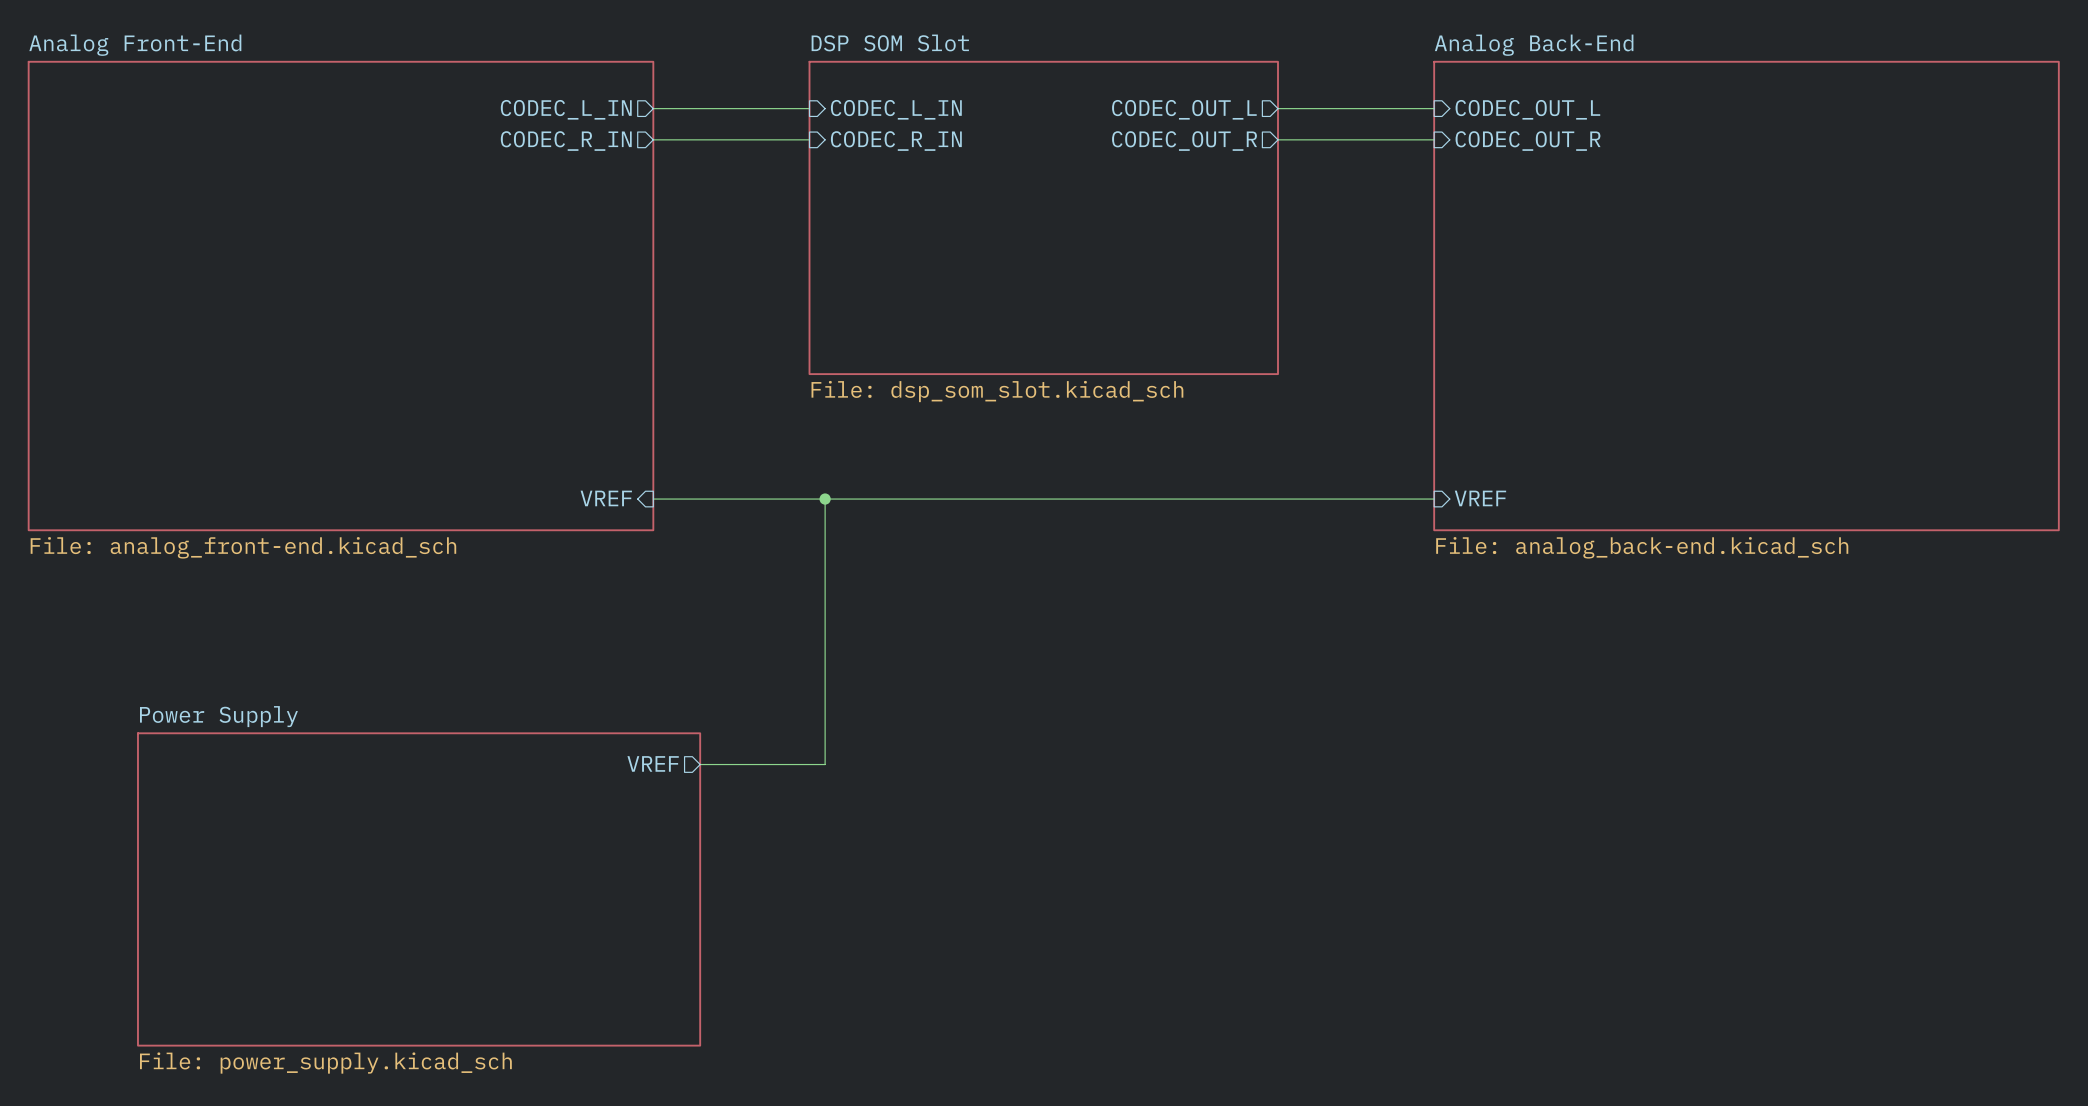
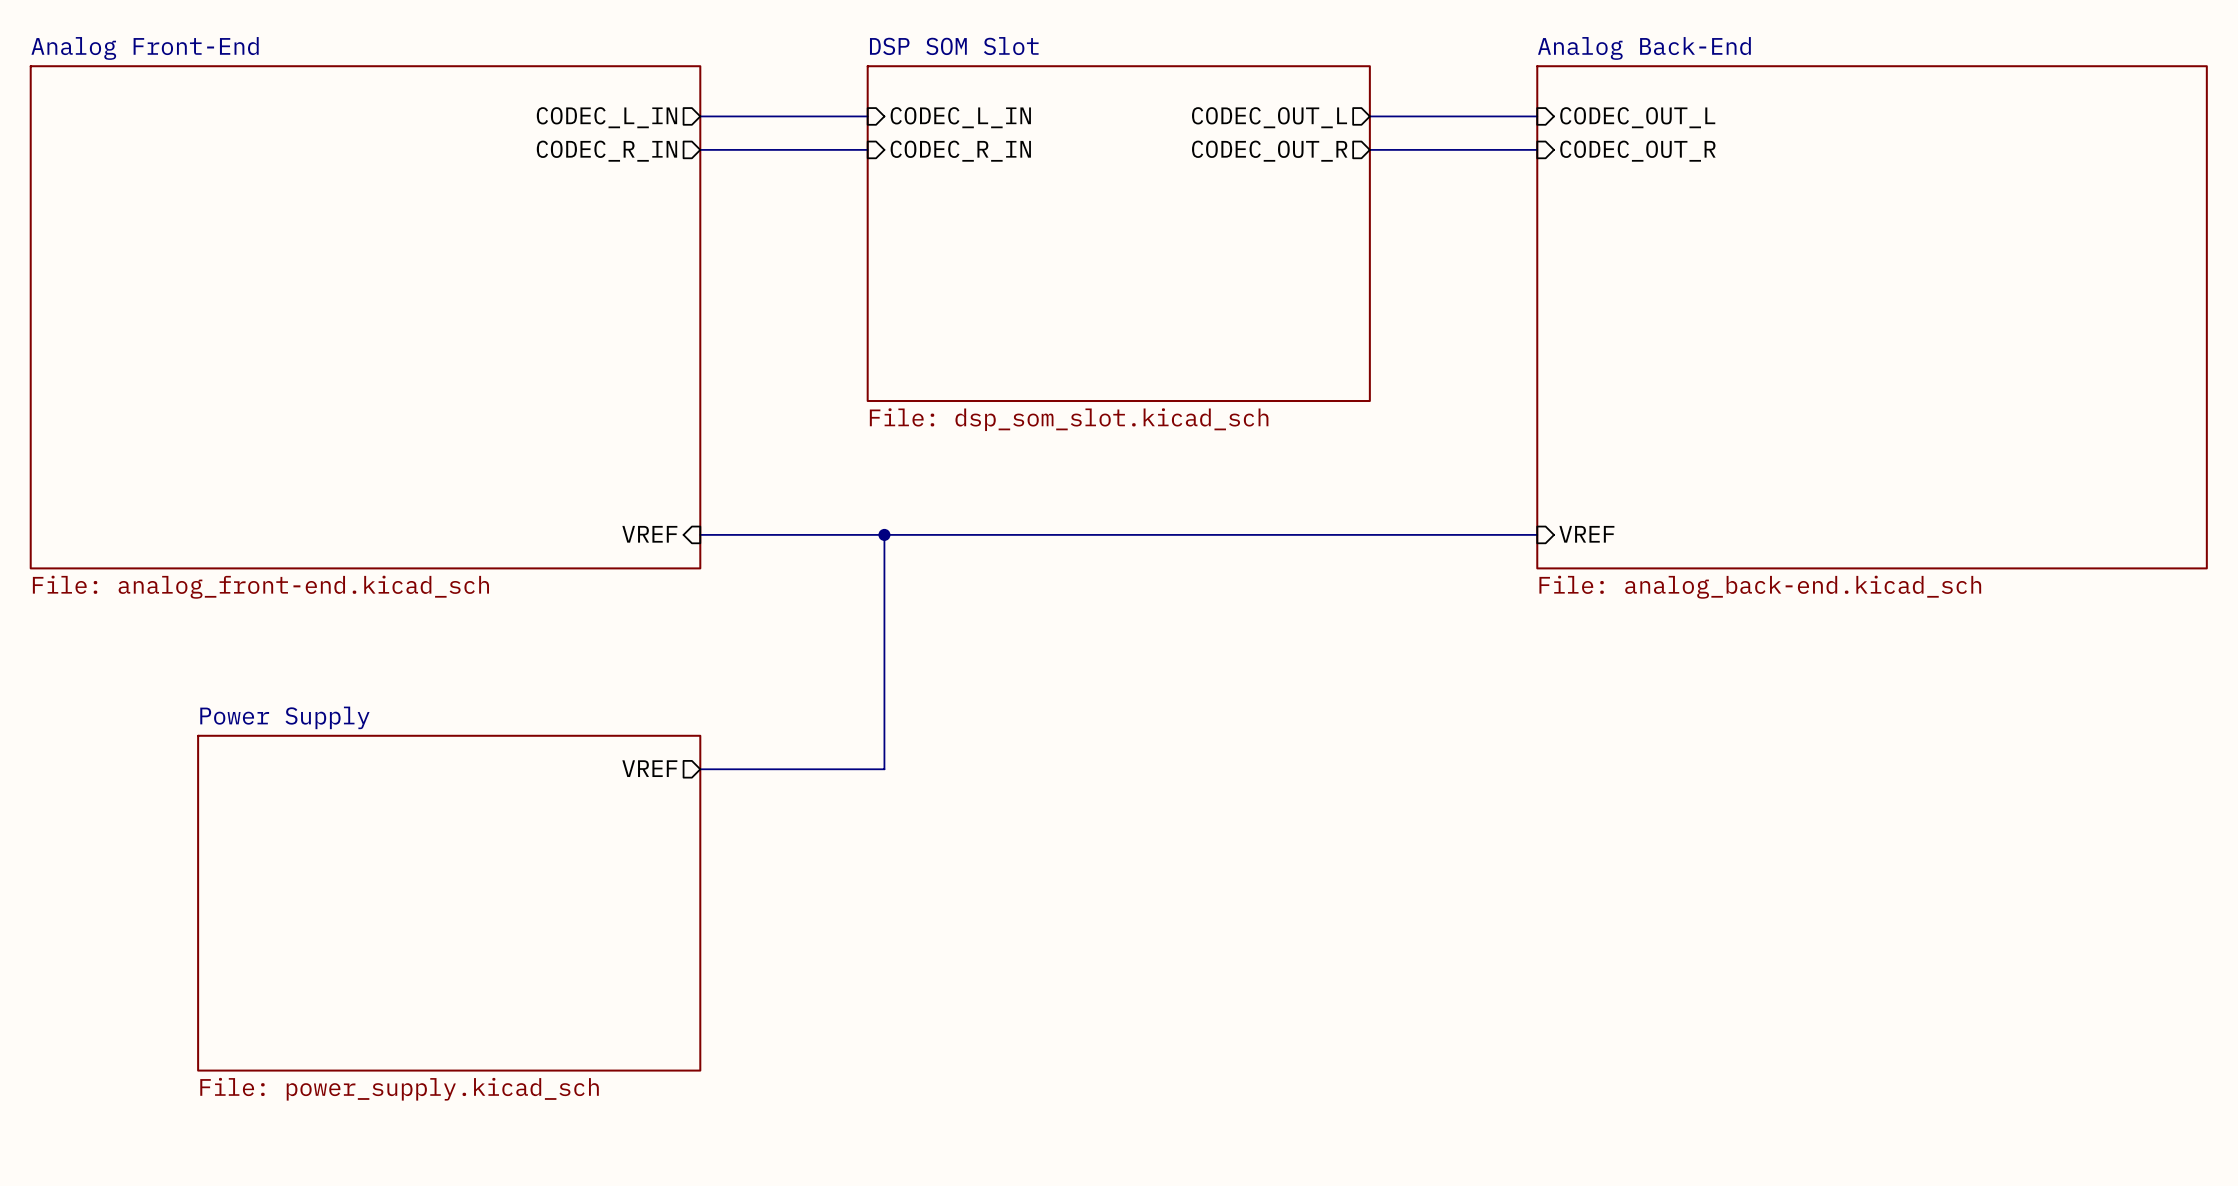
wire: (825, 717) (825, 764) (700, 764) -> (884, 769) (700, 769)
sheet pin position: VREF (653, 763) -> VREF (649, 768)
sheet Power Supply: none -> File: power_supply.kicad_sch (449, 903)
sheet Power Supply: File: power_supply.kicad_sch (419, 889) -> none

